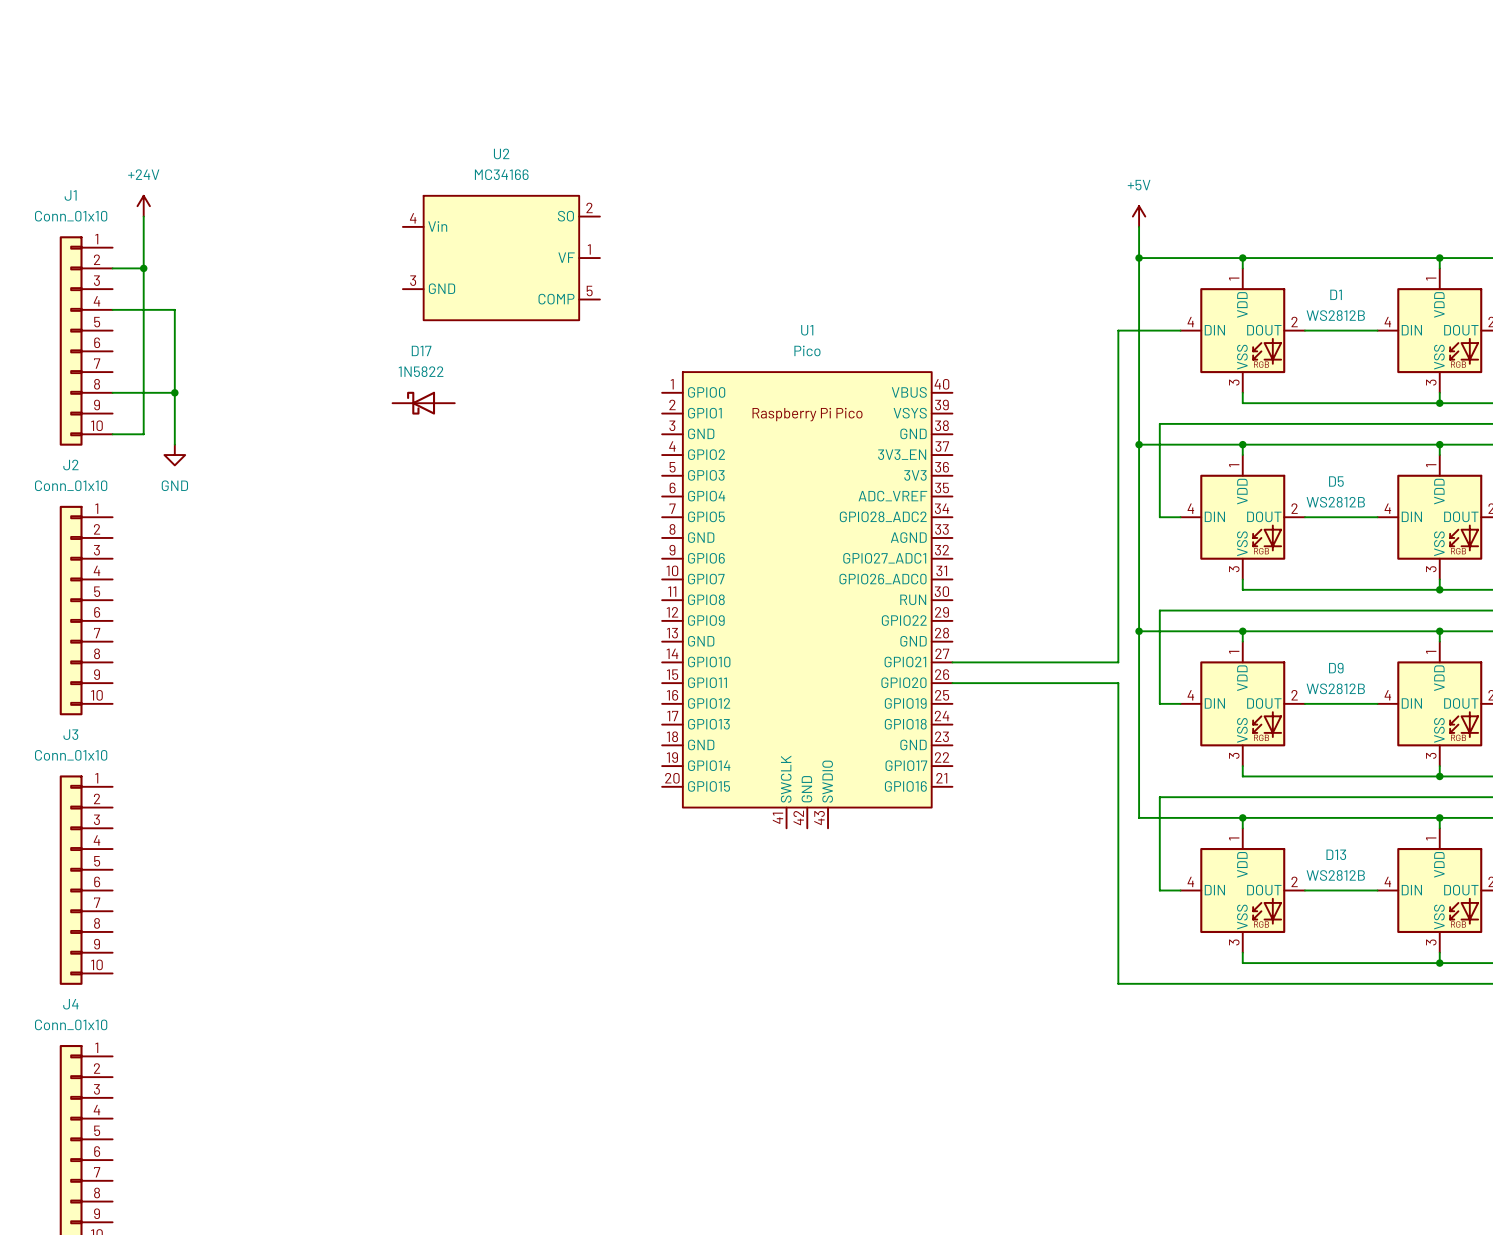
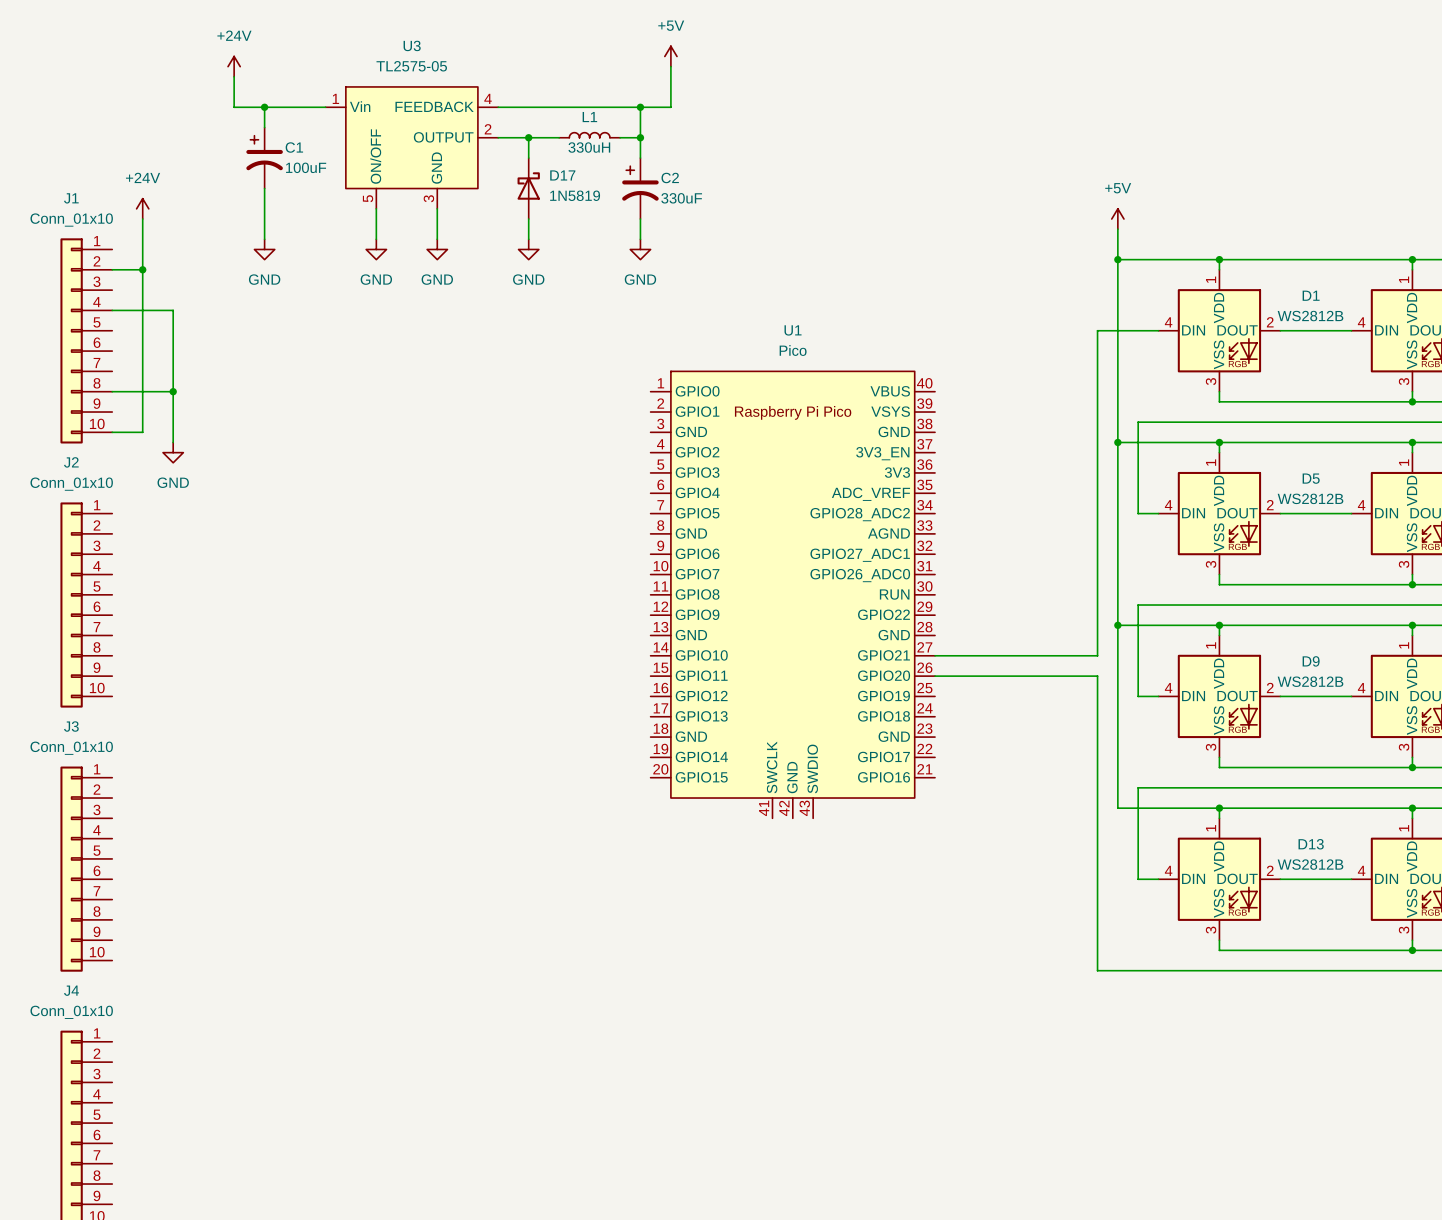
power symbol: none -> +5V (670, 56)
power symbol: none -> +24V (234, 66)
wire: none -> (670, 66) (670, 107) (498, 107)
wire: none -> (234, 76) (234, 107) (325, 107)
wire: none -> (264, 107) (264, 127)
junction: none -> (264, 107)
wire: none -> (640, 107) (640, 158)
junction: none -> (640, 107)
L1: none -> 330uH (589, 135)
wire: none -> (498, 137) (559, 137)
wire: none -> (528, 137) (528, 158)
junction: none -> (528, 137)
wire: none -> (620, 137) (640, 137)
junction: none -> (640, 137)
U3: none -> TL2575-05 (411, 147)
C1: none -> 100uF (264, 158)
wire: none -> (264, 188) (264, 239)
C2: none -> 330uF (640, 188)
wire: none -> (376, 208) (376, 239)
wire: none -> (640, 219) (640, 239)
power symbol: none -> GND (264, 249)
power symbol: none -> GND (376, 249)
power symbol: none -> GND (437, 249)
power symbol: none -> GND (528, 249)
power symbol: none -> GND (640, 249)
U2: MC34166 (501, 258) -> none
D17 name position: D17 (421, 350) -> D17 (562, 175)
D17 value: 1N5822 (421, 371) -> 1N5819 (575, 195)
D17 rotation: 0° (421, 403) -> 90° clockwise (528, 186)
D17 position: (423, 403) -> (528, 188)

